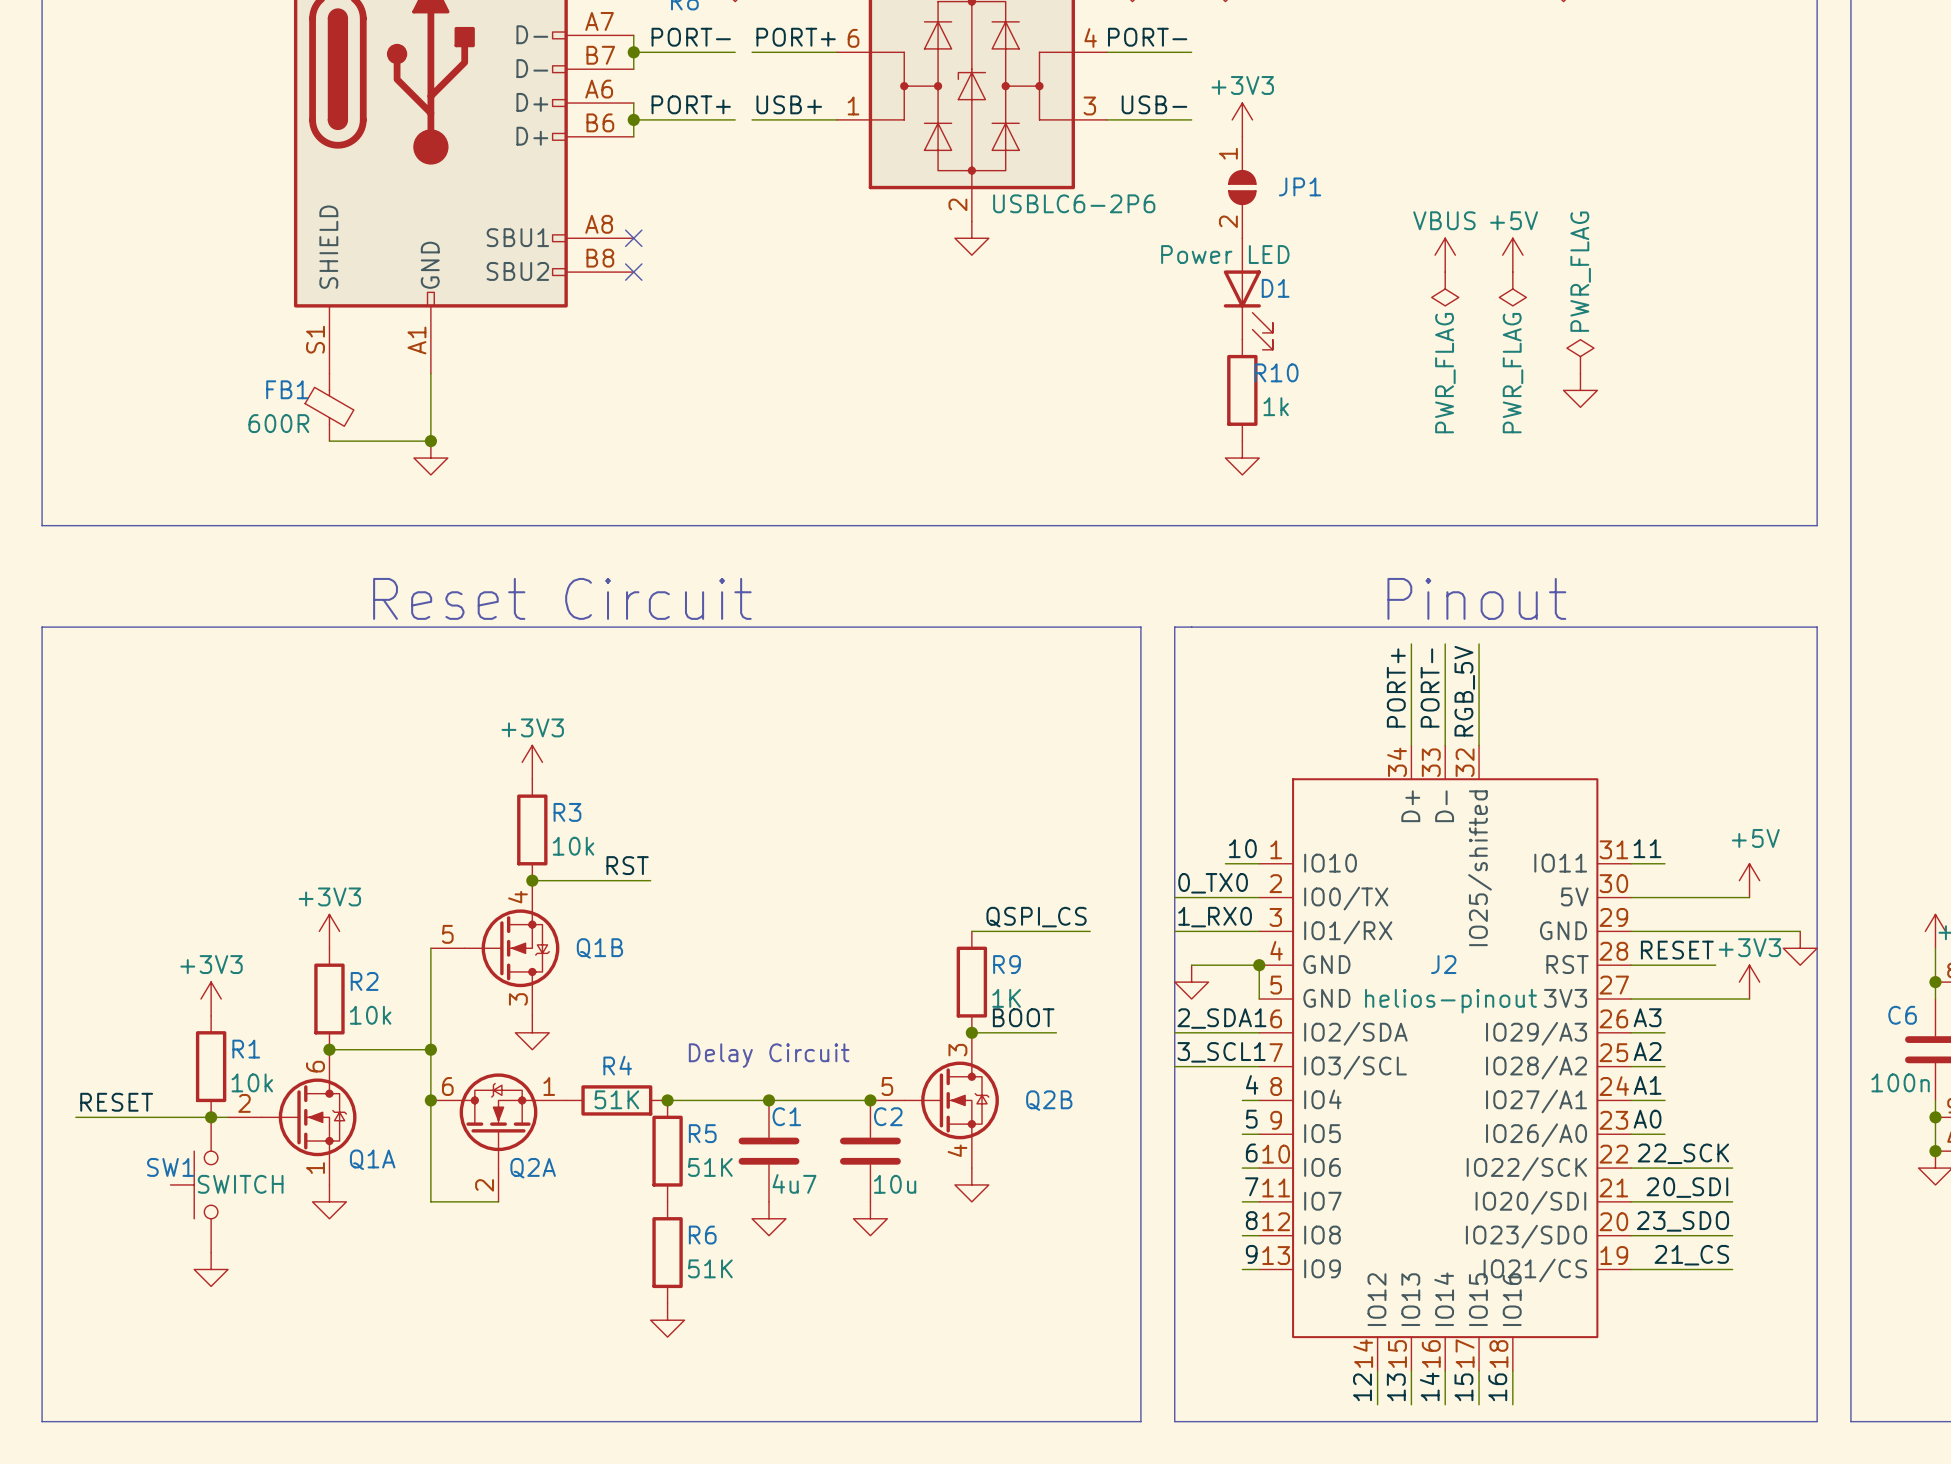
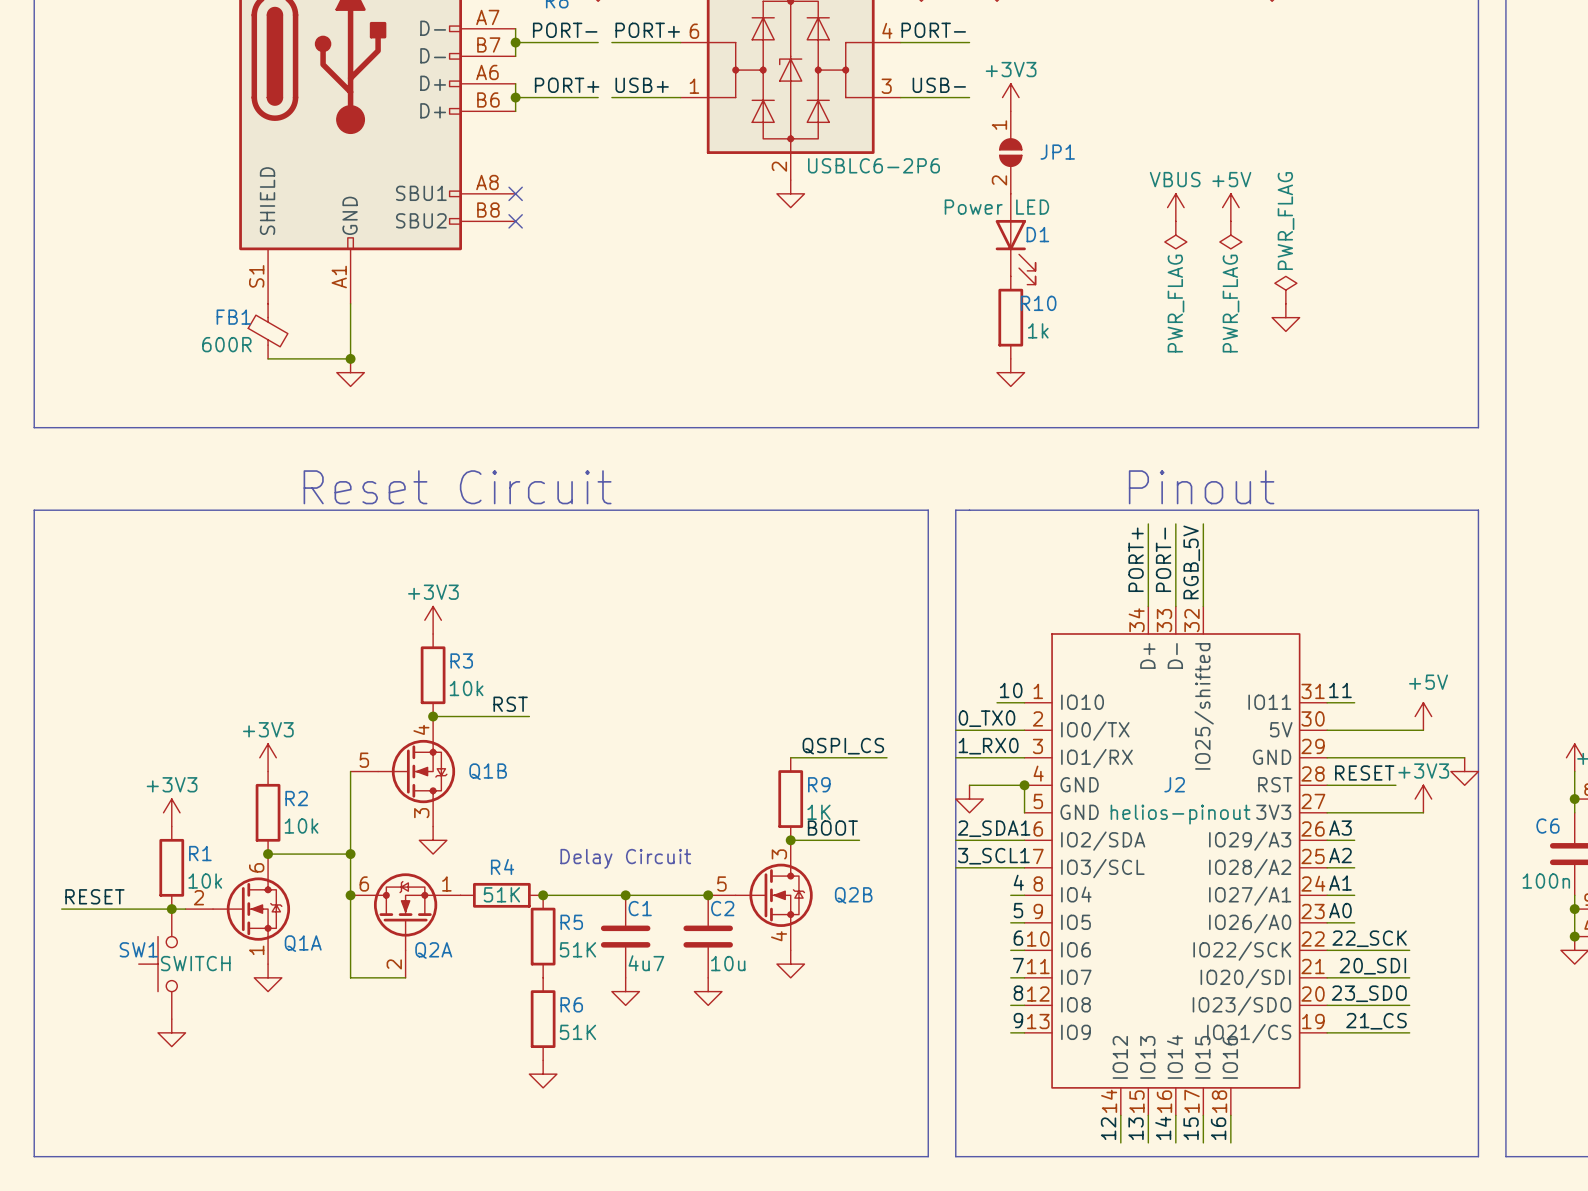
label position: PORT- (691, 37) -> PORT- (565, 30)
label position: PORT+ (691, 104) -> PORT+ (567, 85)

